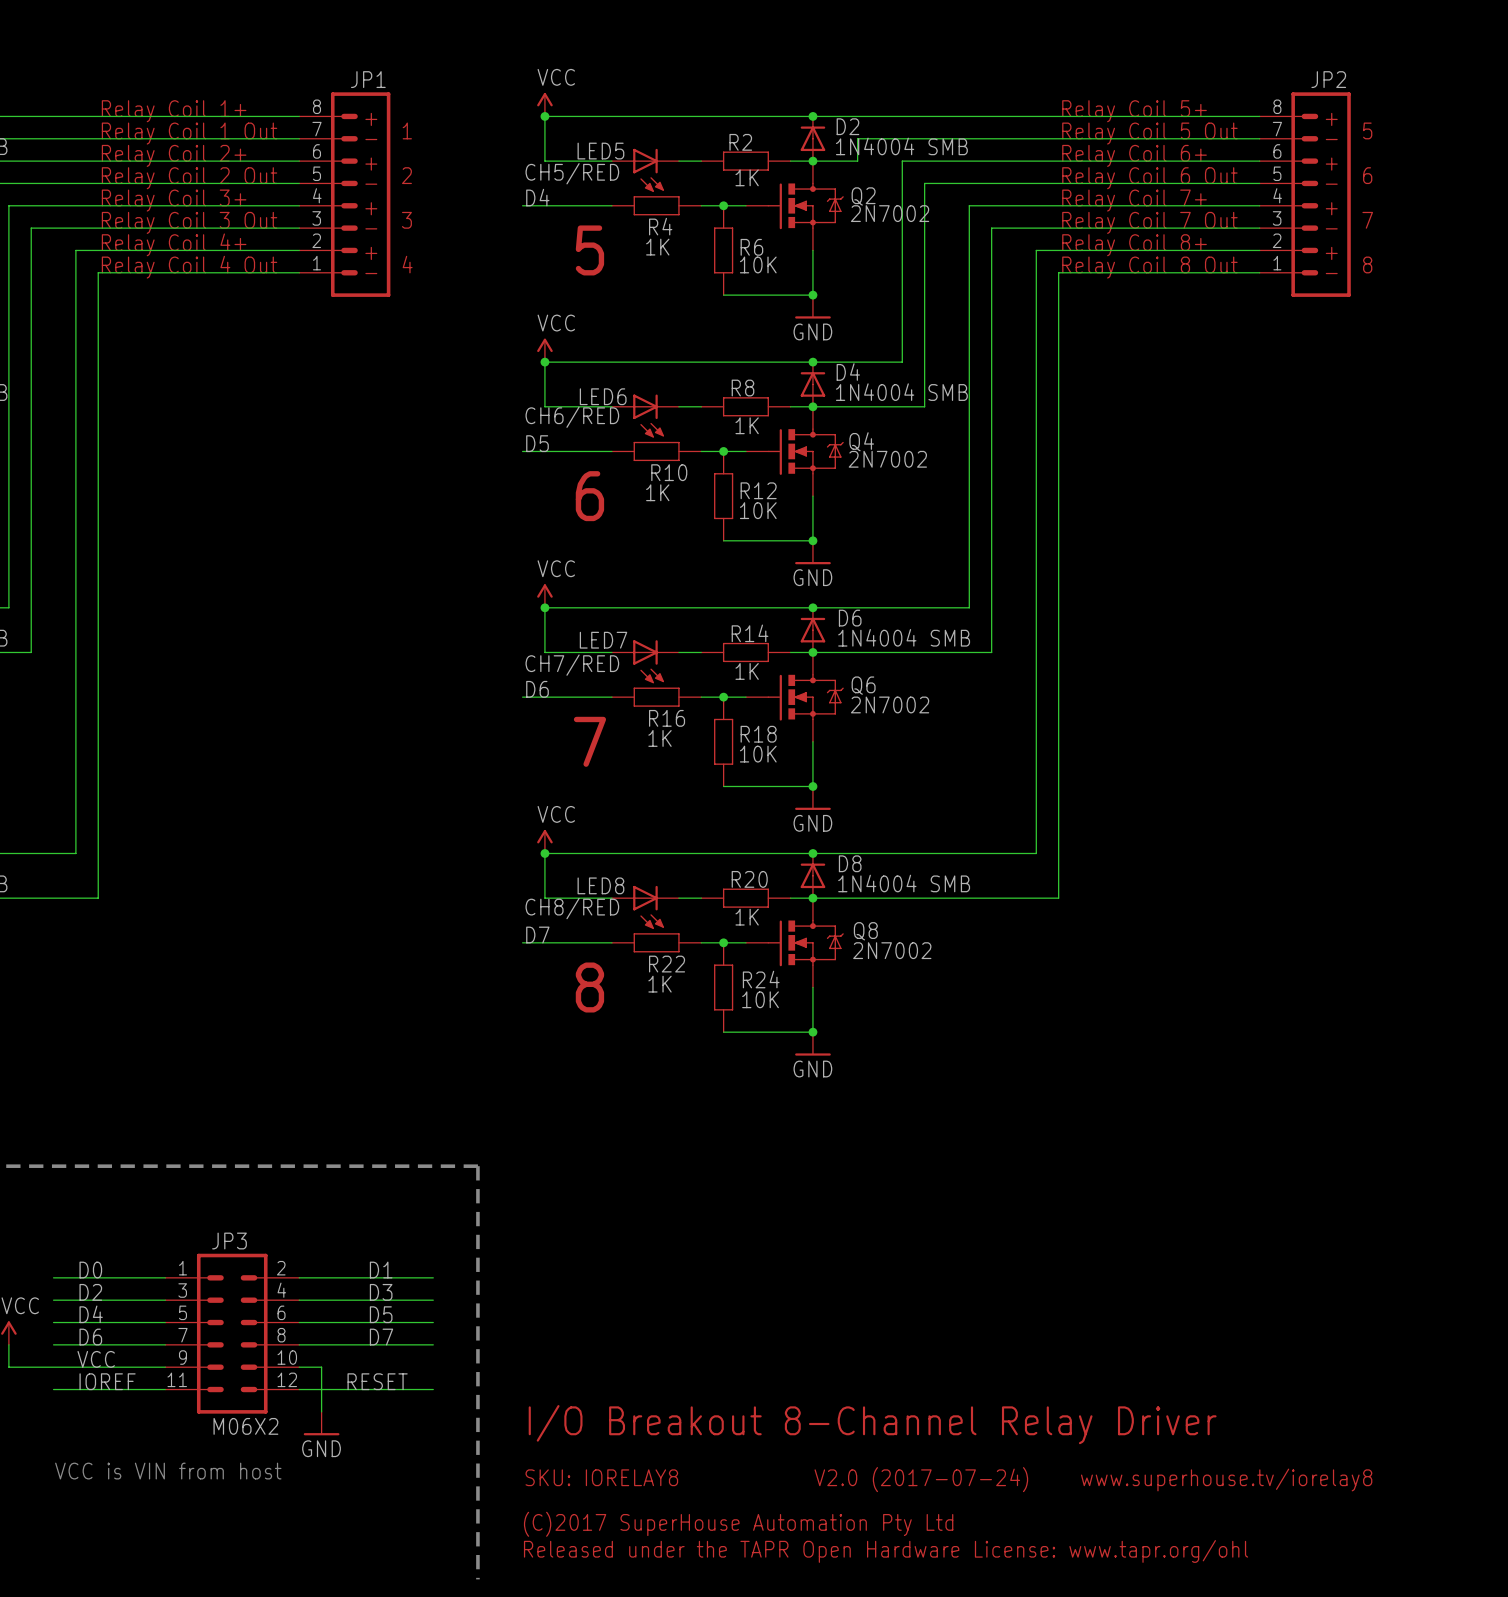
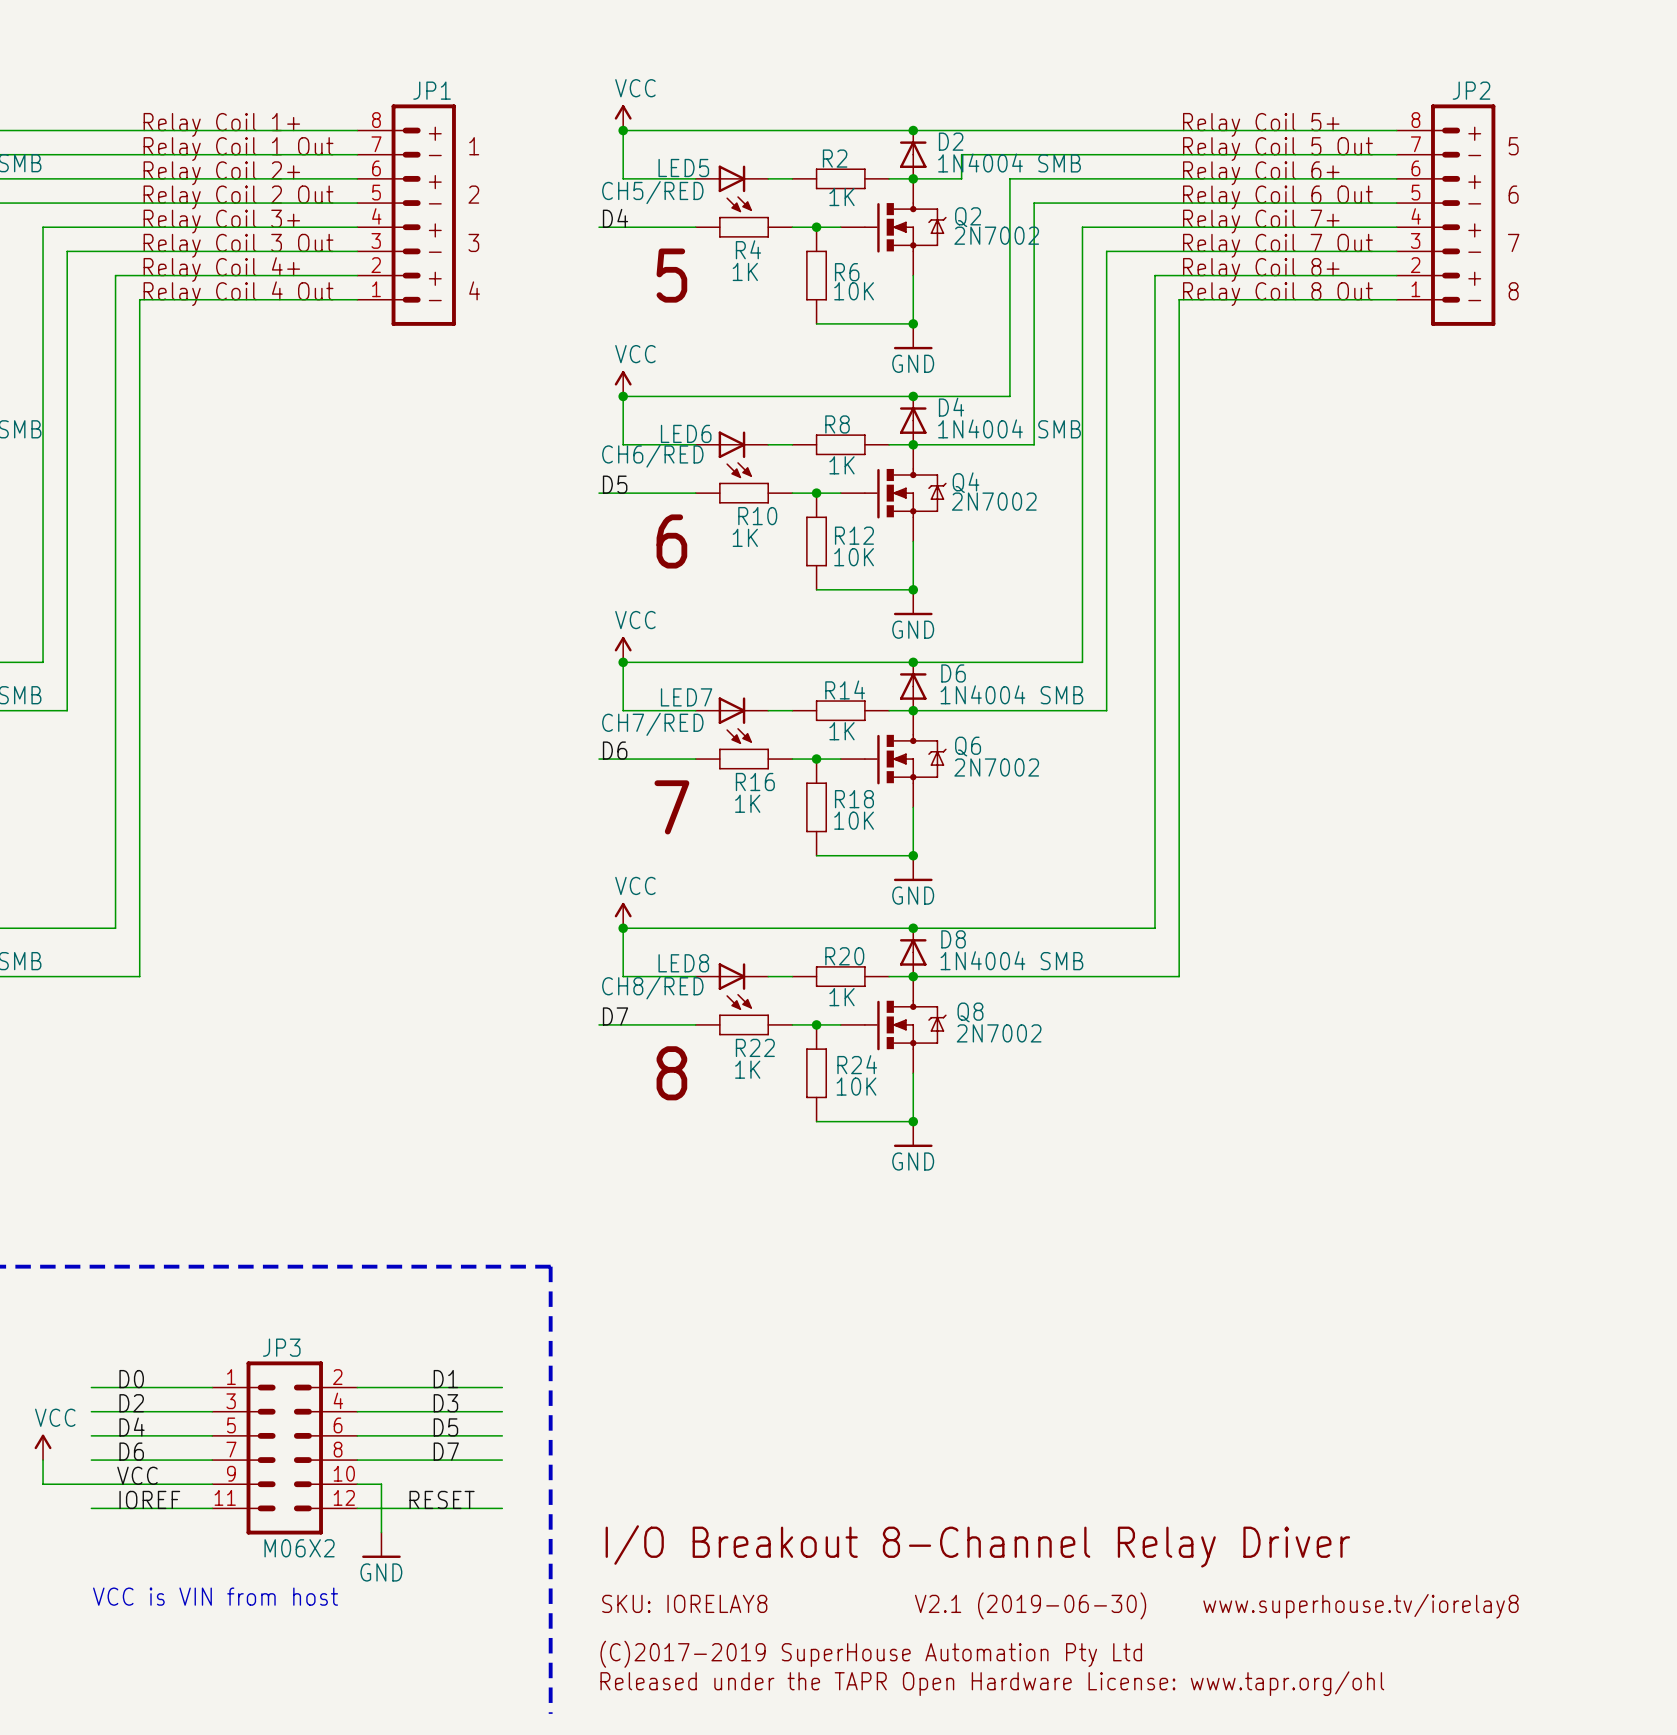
text: V2.0 (2017-07-24) (921, 1479) -> V2.1 (2019-06-30) (1030, 1605)
text: (C)2017 SuperHouse Automation Pty Ltd (738, 1524) -> (C)2017-2019 SuperHouse Automation Pty Ltd (871, 1654)

